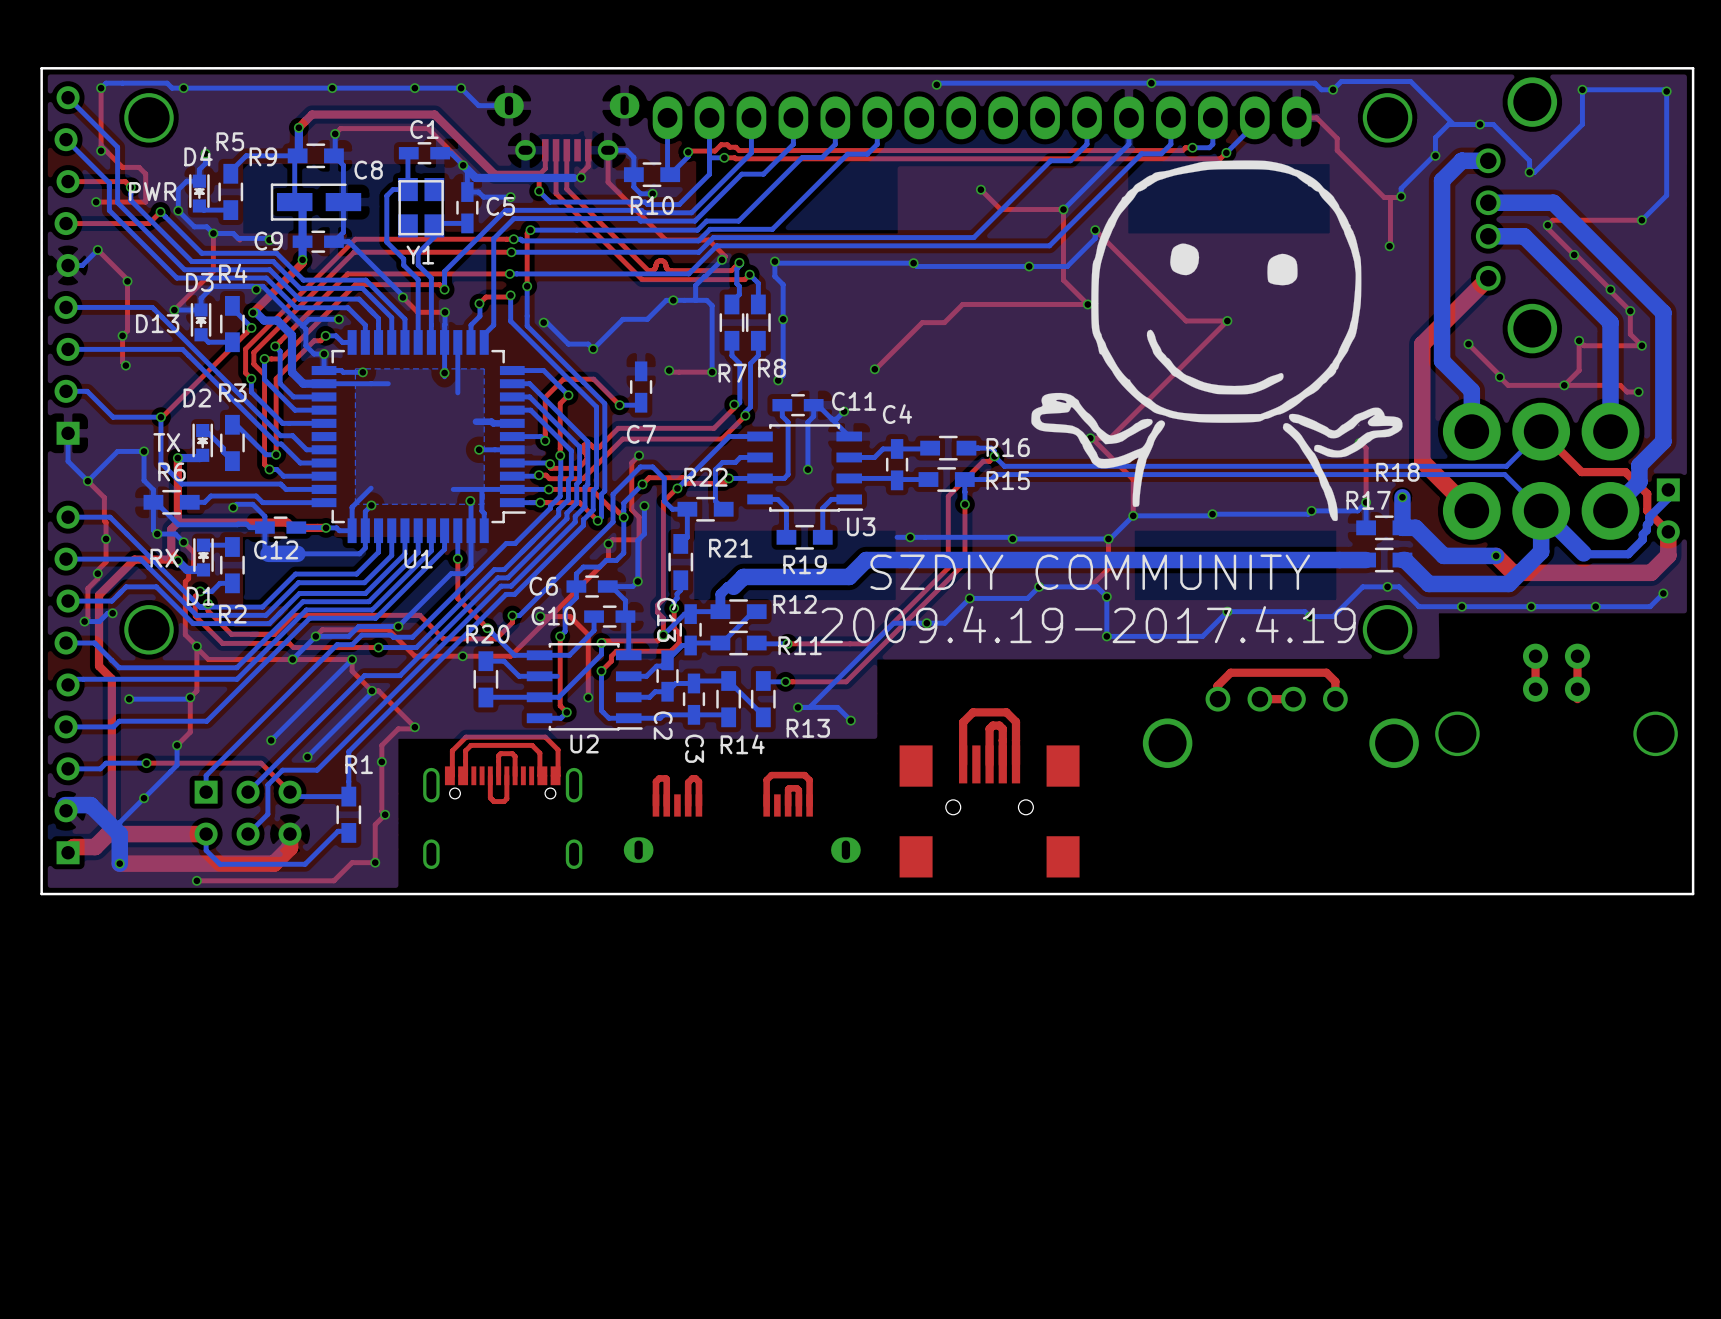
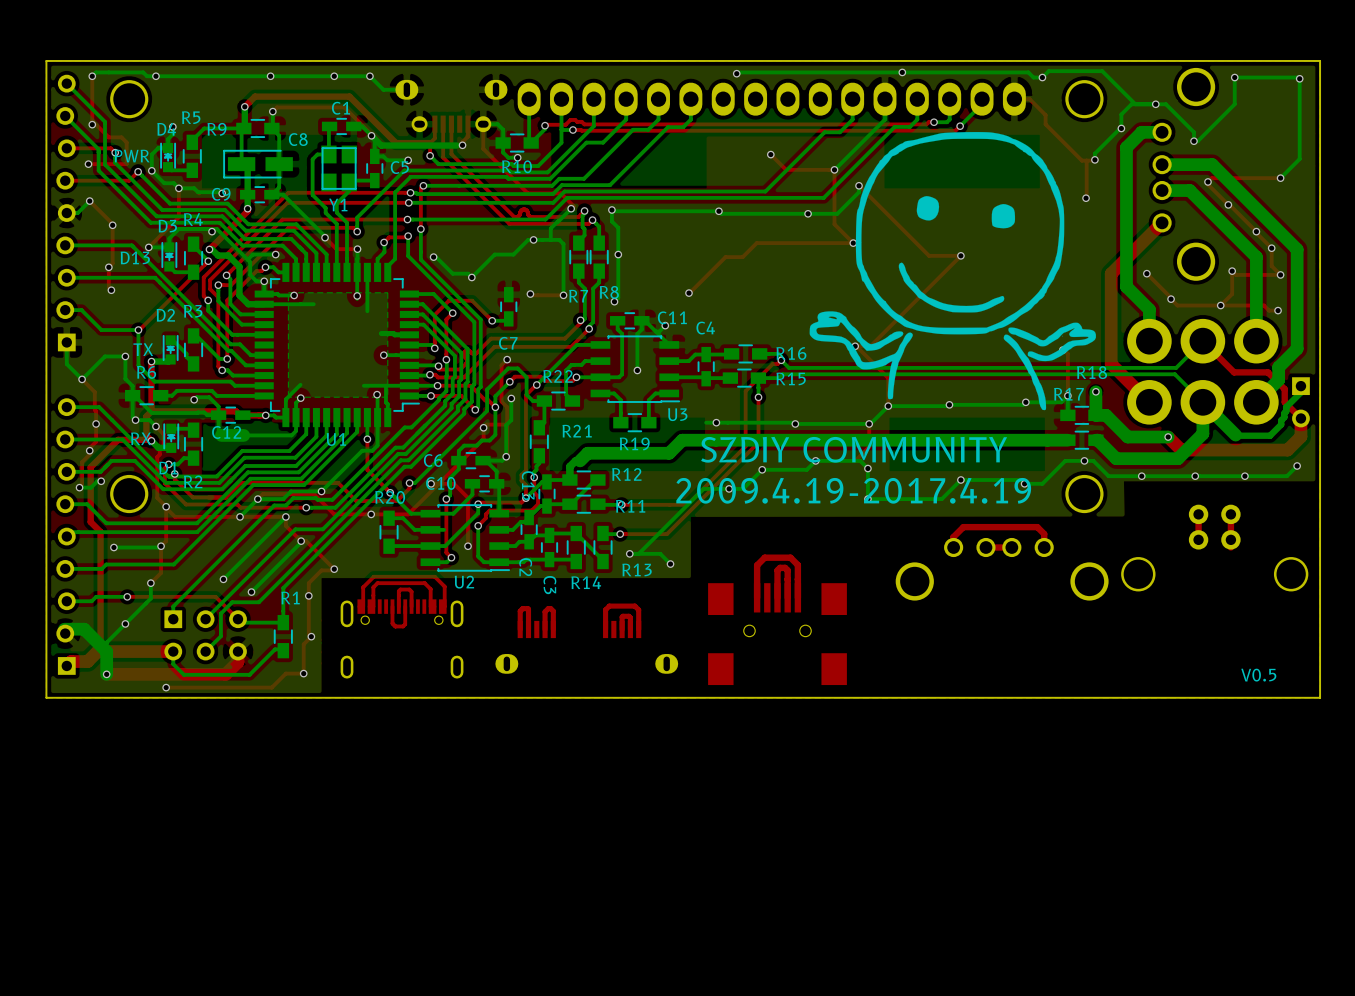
text: none -> V0.5 (1258, 675)

